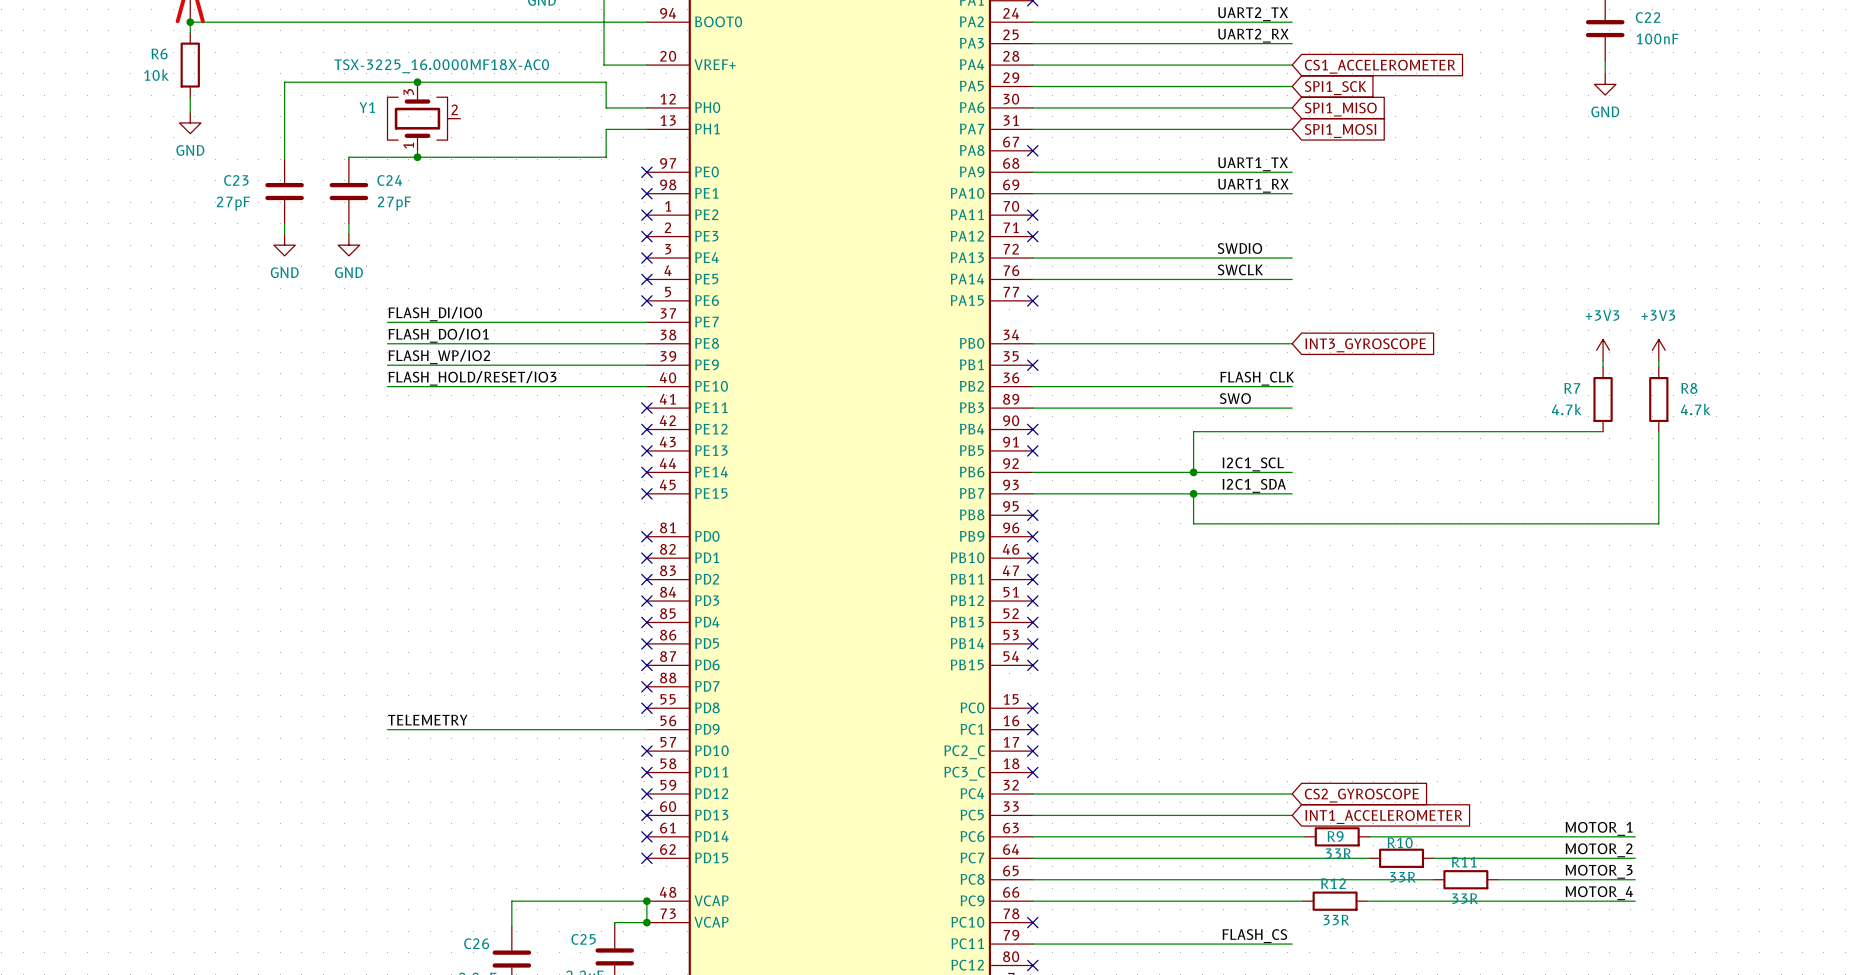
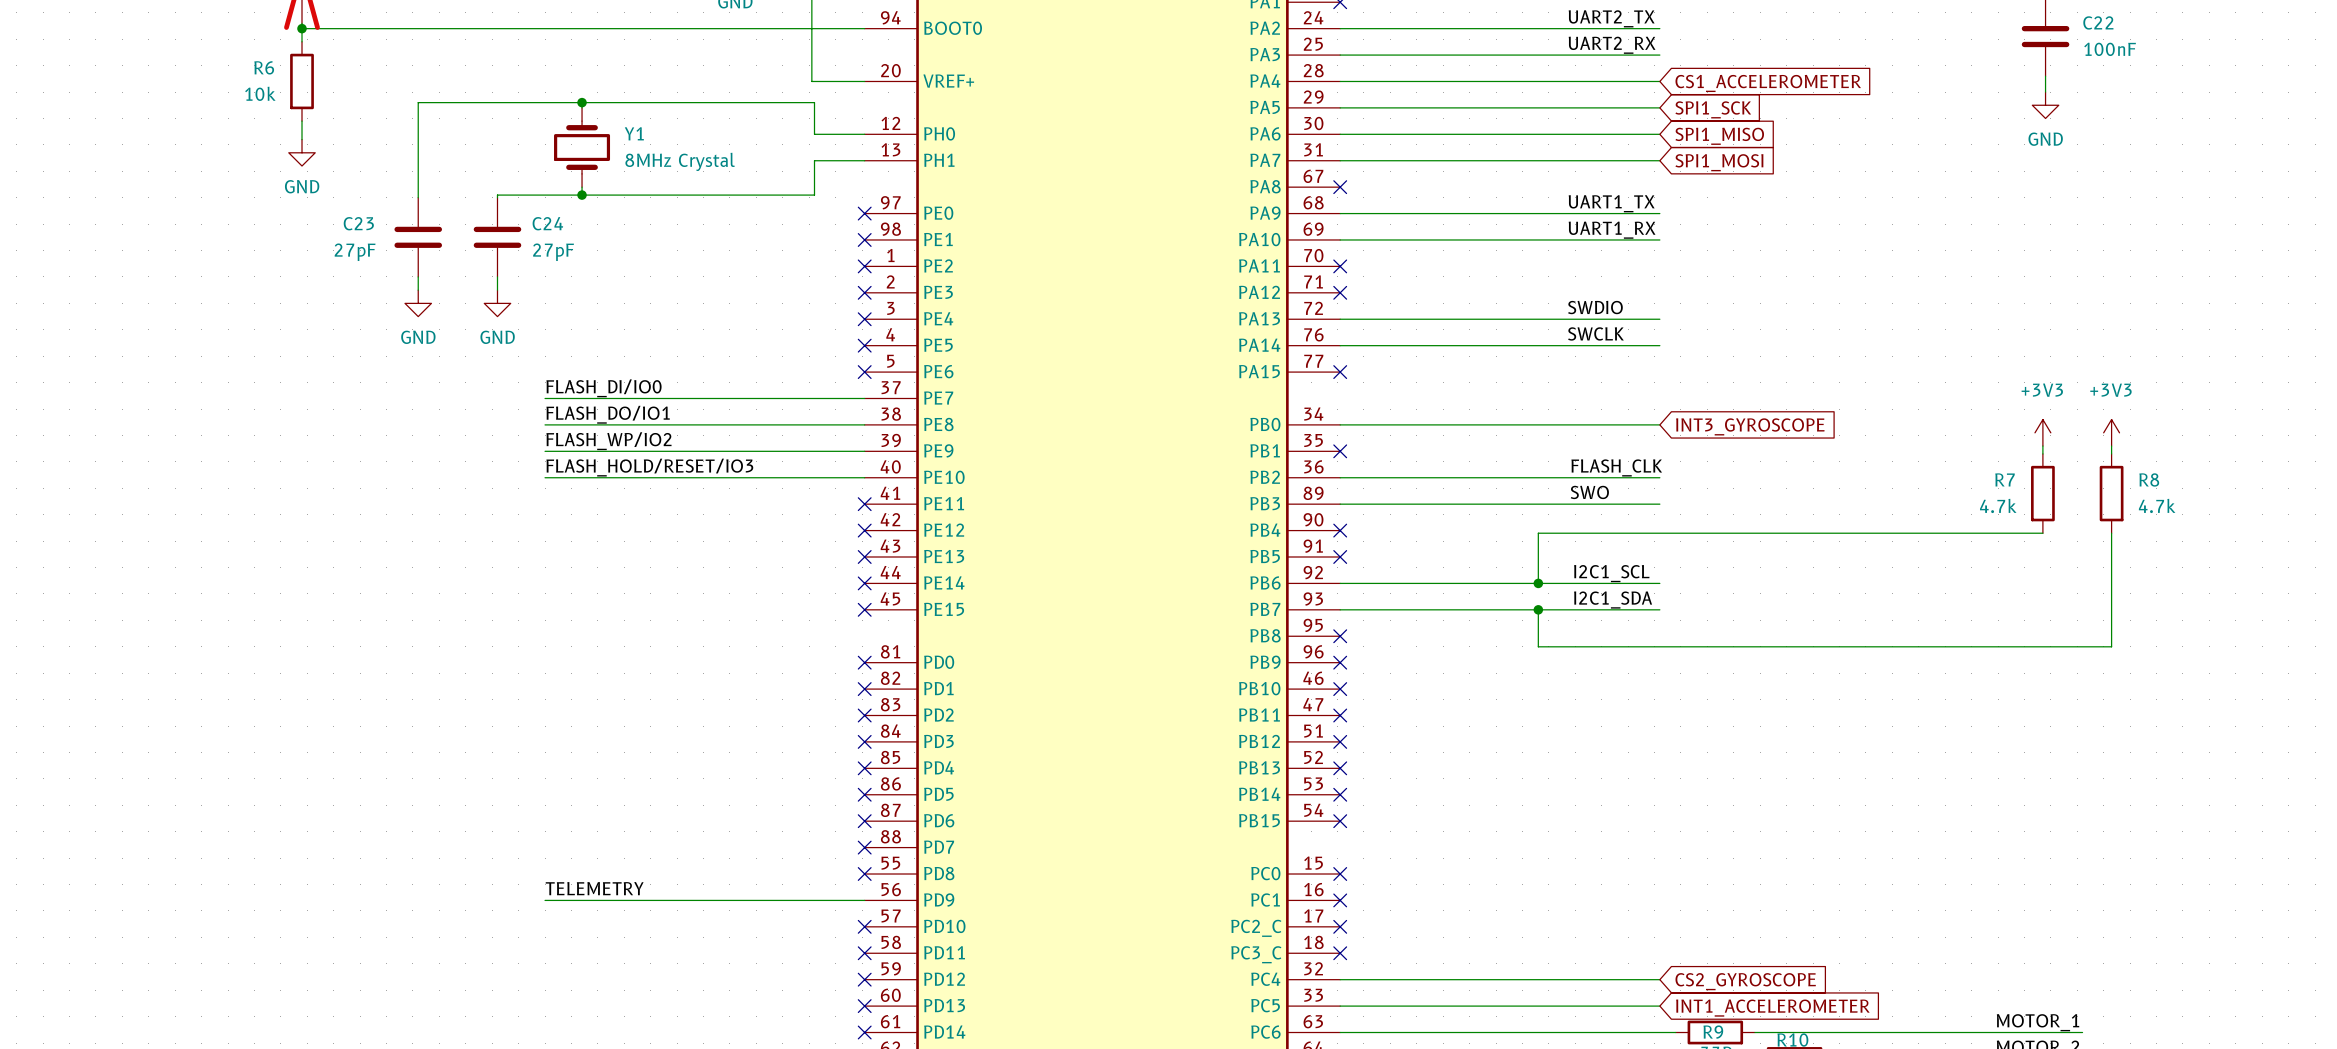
Y1 value: TSX-3225_16.0000MF18X-AC0 (441, 66) -> 8MHz Crystal (680, 161)
Y1 symbol: [387, 86, 461, 151] -> [554, 107, 611, 188]
Y1 name position: Y1 (367, 107) -> Y1 (634, 133)

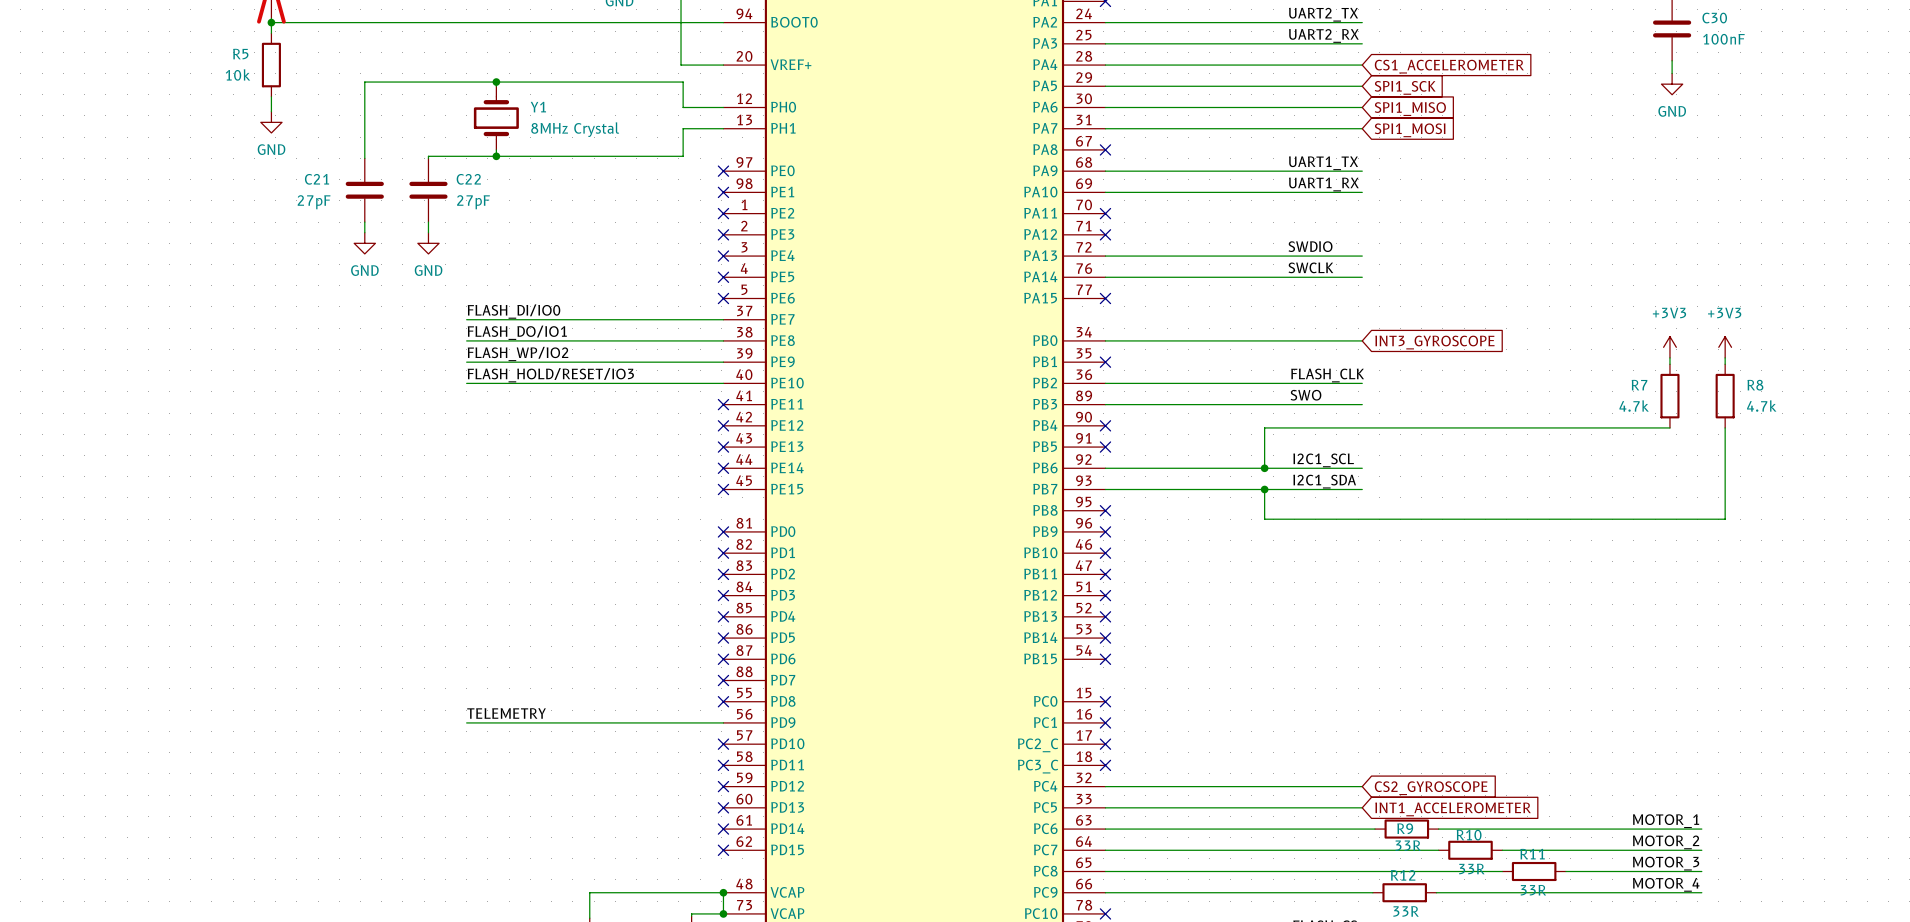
C22 name: C22 (2098, 22) -> C30 (1714, 18)
R6 name: R6 (264, 67) -> R5 (240, 54)
C23 name: C23 (358, 223) -> C21 (317, 179)
C24 name: C24 (547, 223) -> C22 (468, 179)

